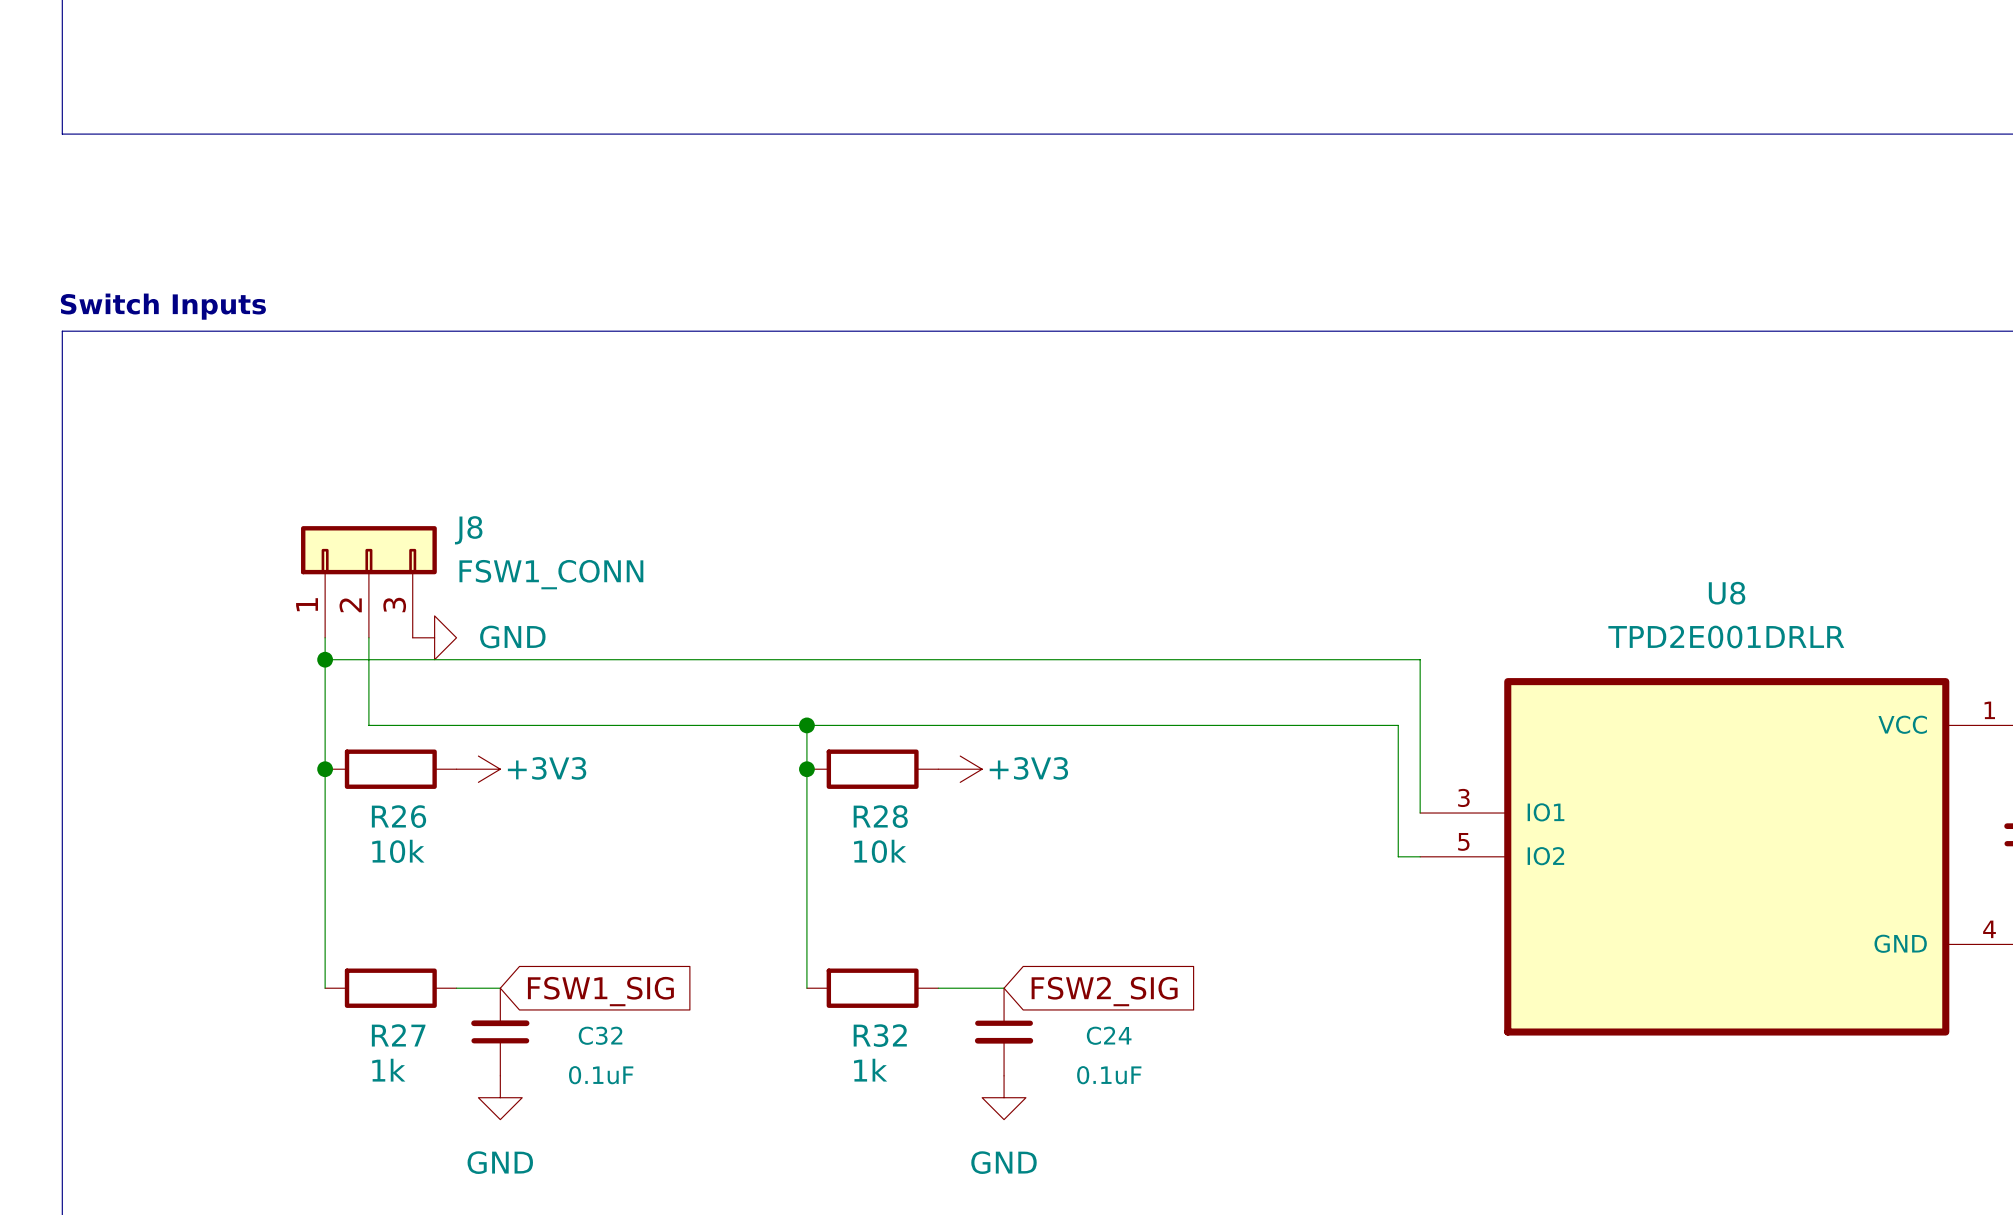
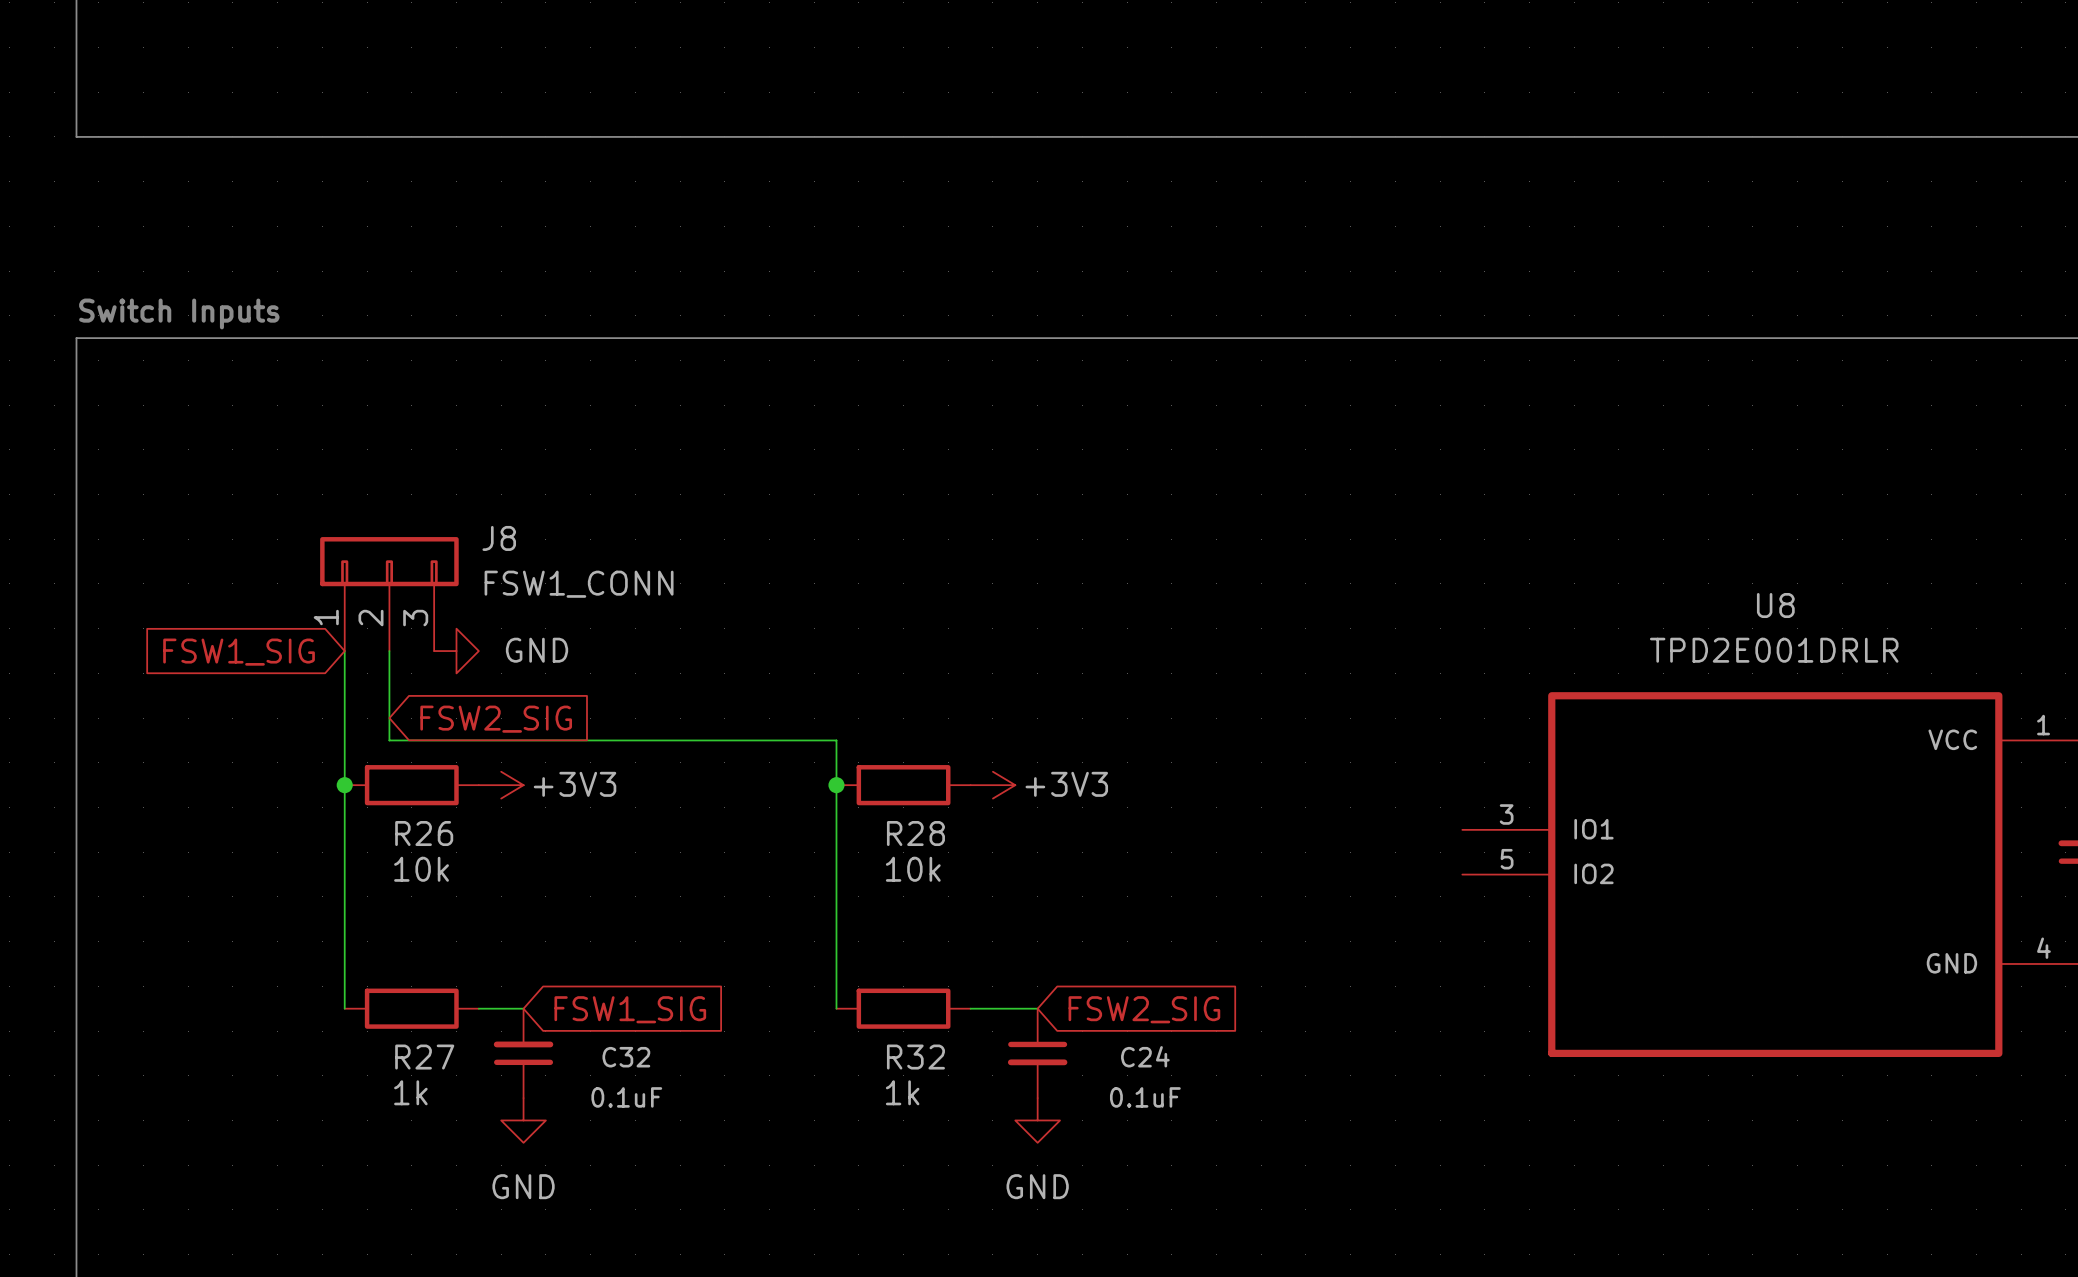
global label: none -> FSW1_SIG (239, 652)
wire: (325, 659) (1420, 659) (1420, 813) -> none
junction: (325, 659) -> none
global label: none -> FSW2_SIG (496, 719)
wire: (806, 725) (1398, 725) (1398, 856) (1420, 856) -> none
junction: (806, 725) -> none

